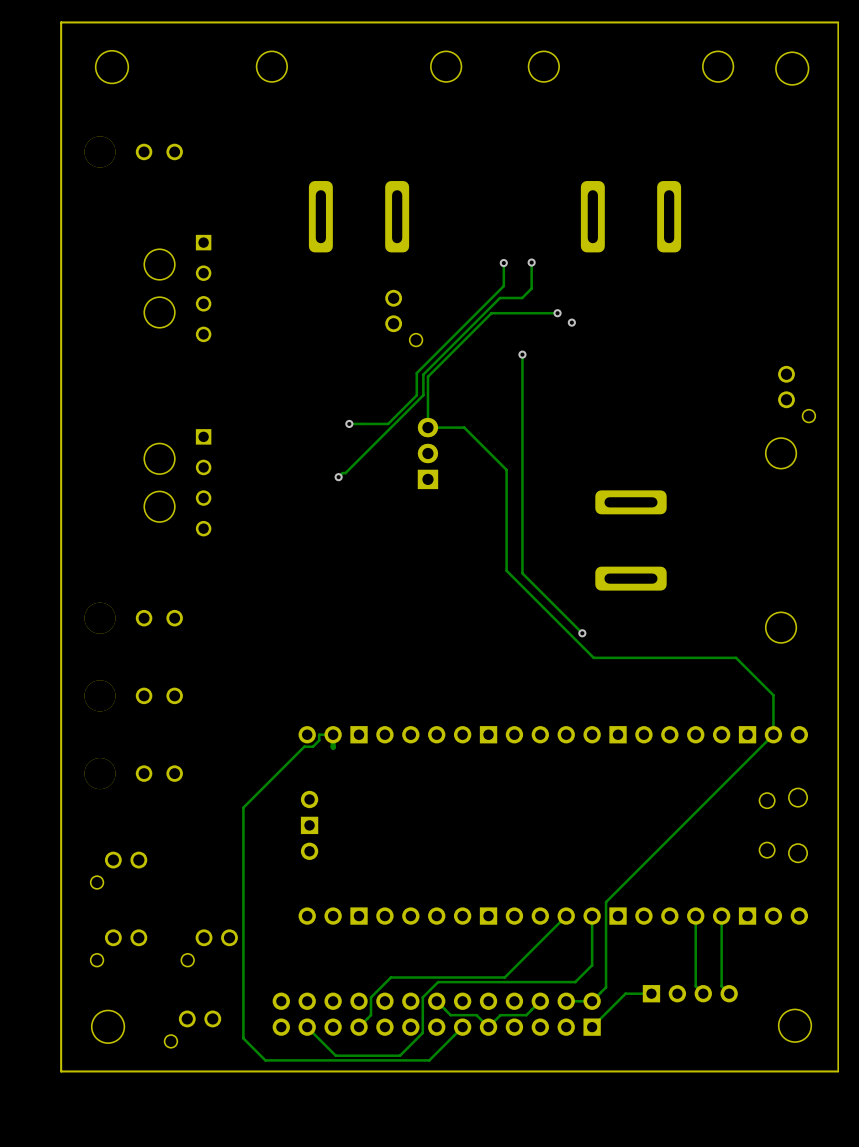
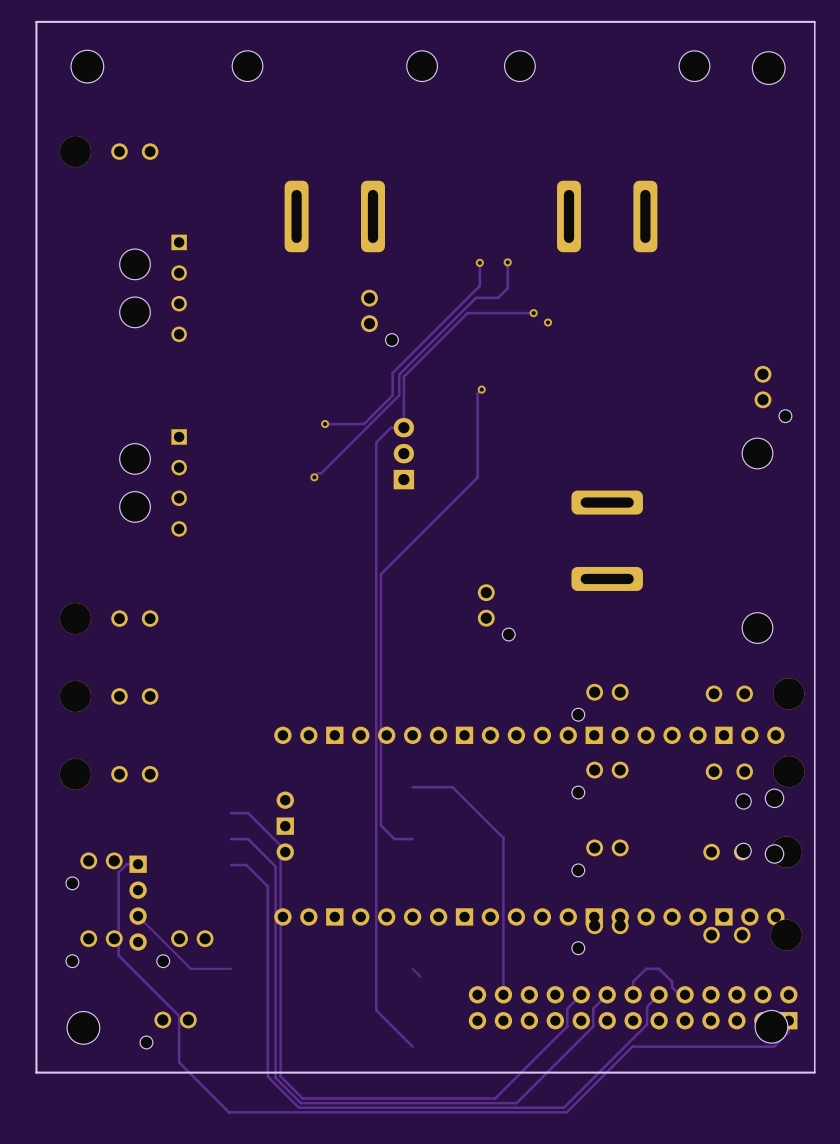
track: (522, 354) (522, 573) (582, 633) -> none
via position: (522, 354) -> (481, 389)
track: none -> (481, 389) (477, 393) (477, 477) (380, 574) (380, 825) (394, 839) (412, 839)
track: (427, 427) (464, 427) (506, 469) (506, 570) (593, 657) (736, 657) (773, 695) (773, 734) (606, 902) (606, 987) (592, 1001) (566, 1001) -> (403, 427) (391, 427) (376, 442) (376, 1010) (412, 1046)
part: none -> (496, 612)
via: (582, 633) -> none
part: none -> (755, 693)
part: none -> (600, 702)
track: (333, 747) (333, 734) (319, 734) (319, 740) (312, 746) (304, 746) (243, 807) (243, 1038) (265, 1060) (429, 1060) (462, 1027) -> none
part: none -> (755, 771)
part: none -> (600, 780)
track: none -> (412, 787) (452, 787) (503, 838) (503, 994)
track: none -> (231, 813) (248, 813) (280, 845) (280, 1076) (302, 1098) (495, 1098) (567, 1026) (567, 1008) (581, 994)
track: none -> (231, 839) (248, 839) (275, 866) (275, 1077) (300, 1103) (516, 1103) (593, 1026) (593, 1008) (607, 994)
part: none -> (752, 852)
part: none -> (600, 858)
track: none -> (138, 864) (126, 864) (118, 872) (118, 955) (179, 1016) (179, 1062) (228, 1112) (566, 1112) (632, 1046) (774, 1046) (788, 1031) (788, 1020)
track: none -> (231, 865) (246, 865) (267, 886) (267, 1076) (298, 1107) (563, 1107) (647, 1024) (647, 1006) (659, 994)
part: none -> (138, 903)
track: none -> (138, 916) (190, 968) (231, 968)
track: (566, 916) (504, 977) (390, 977) (371, 997) (371, 1015) (359, 1027) -> none
track: (592, 916) (592, 965) (575, 982) (438, 982) (422, 997) (422, 1032) (399, 1055) (335, 1055) (307, 1027) -> none
track: (695, 916) (695, 980) -> (633, 994) (633, 981) (646, 968) (659, 968) (672, 981)
track: (721, 916) (721, 986) (729, 993) -> none
part: none -> (752, 935)
part: none -> (600, 935)
track: none -> (412, 968) (420, 976)
track: (651, 993) (625, 993) (592, 1027) -> none
part: (690, 993) -> none
track: (540, 1001) (526, 1015) (500, 1015) (488, 1027) (476, 1015) (450, 1015) (436, 1001) -> none
part position: (436, 1014) -> (633, 1007)

